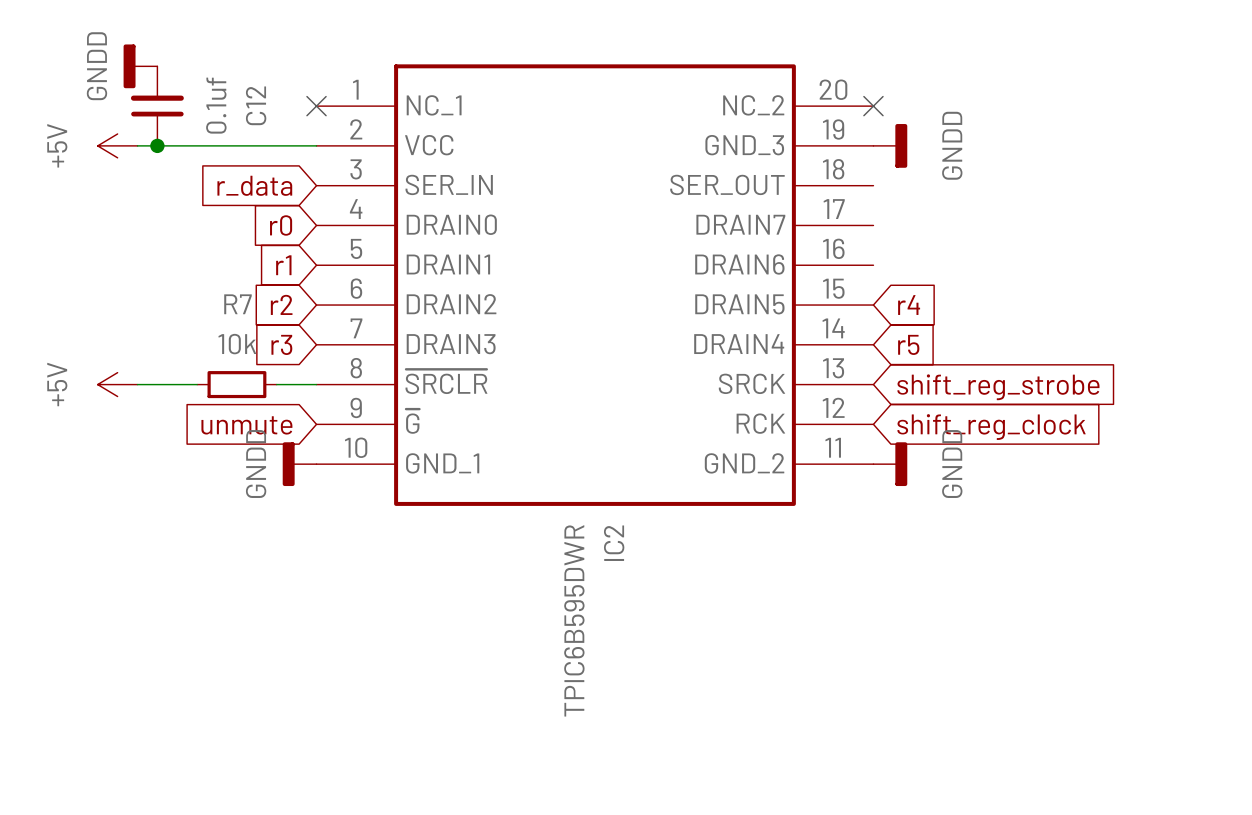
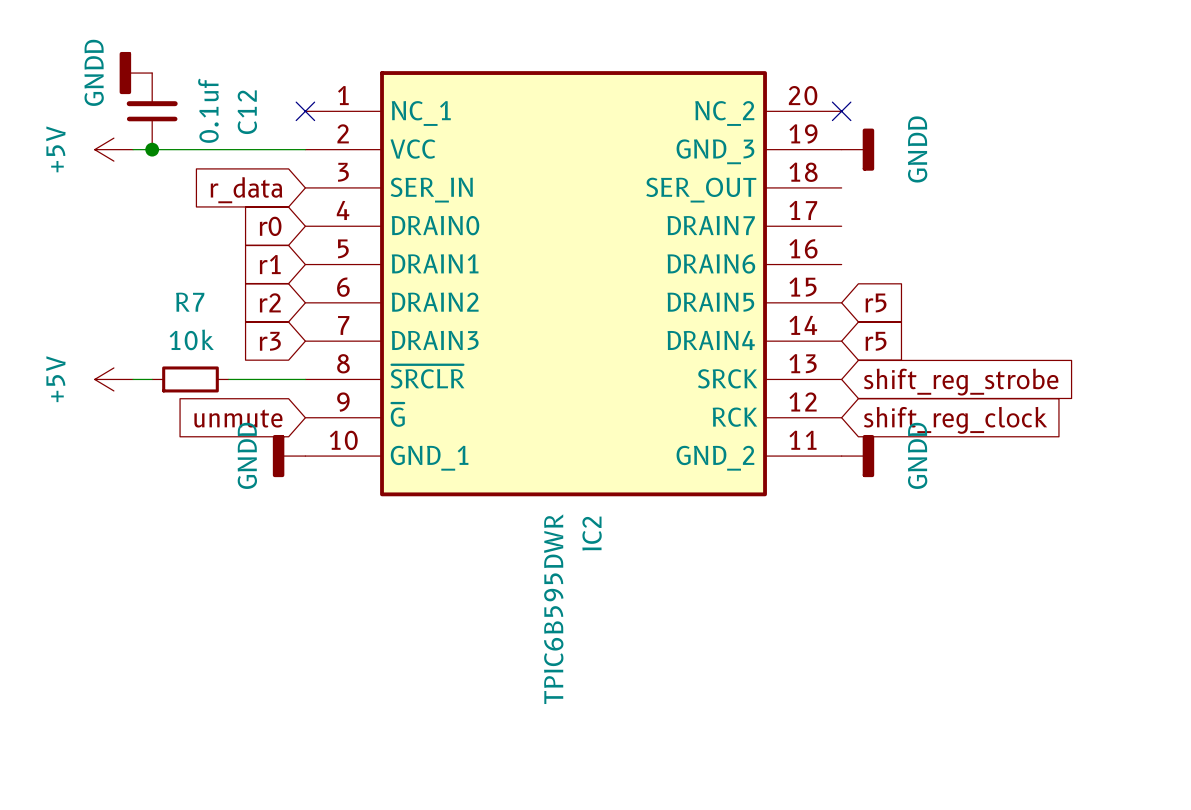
global label: r4 (909, 305) -> r5 (876, 302)
wire: (157, 384) (197, 384) -> (228, 379) (267, 379)
R7 position: (236, 384) -> (190, 379)

